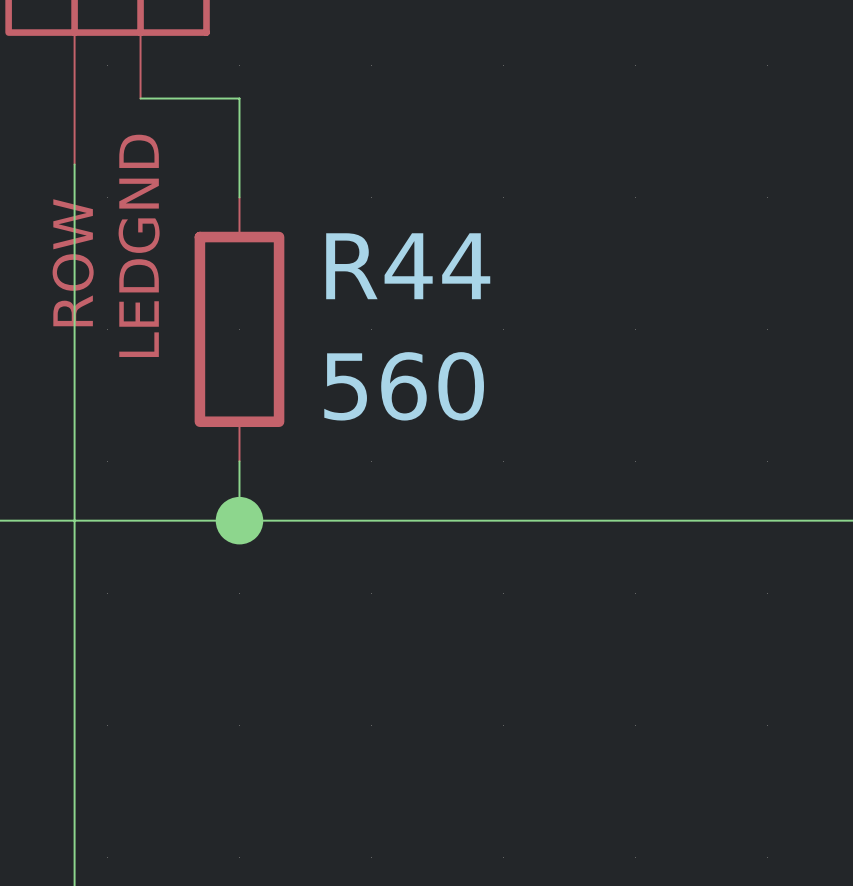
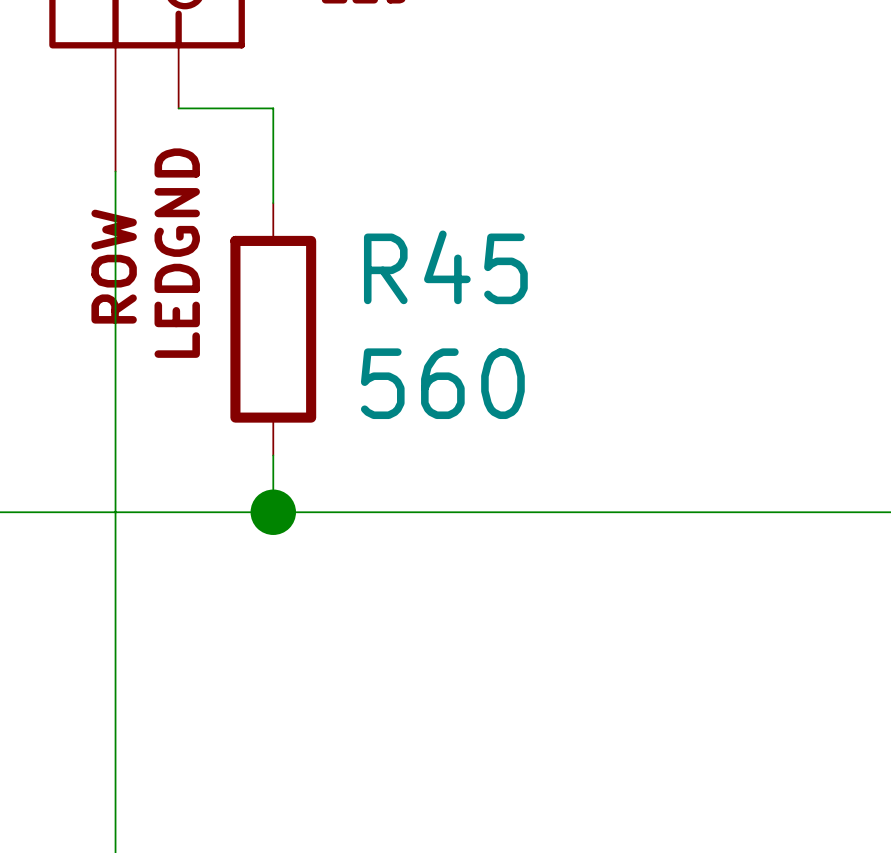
R44 name: R44 (408, 266) -> R45 (445, 267)

